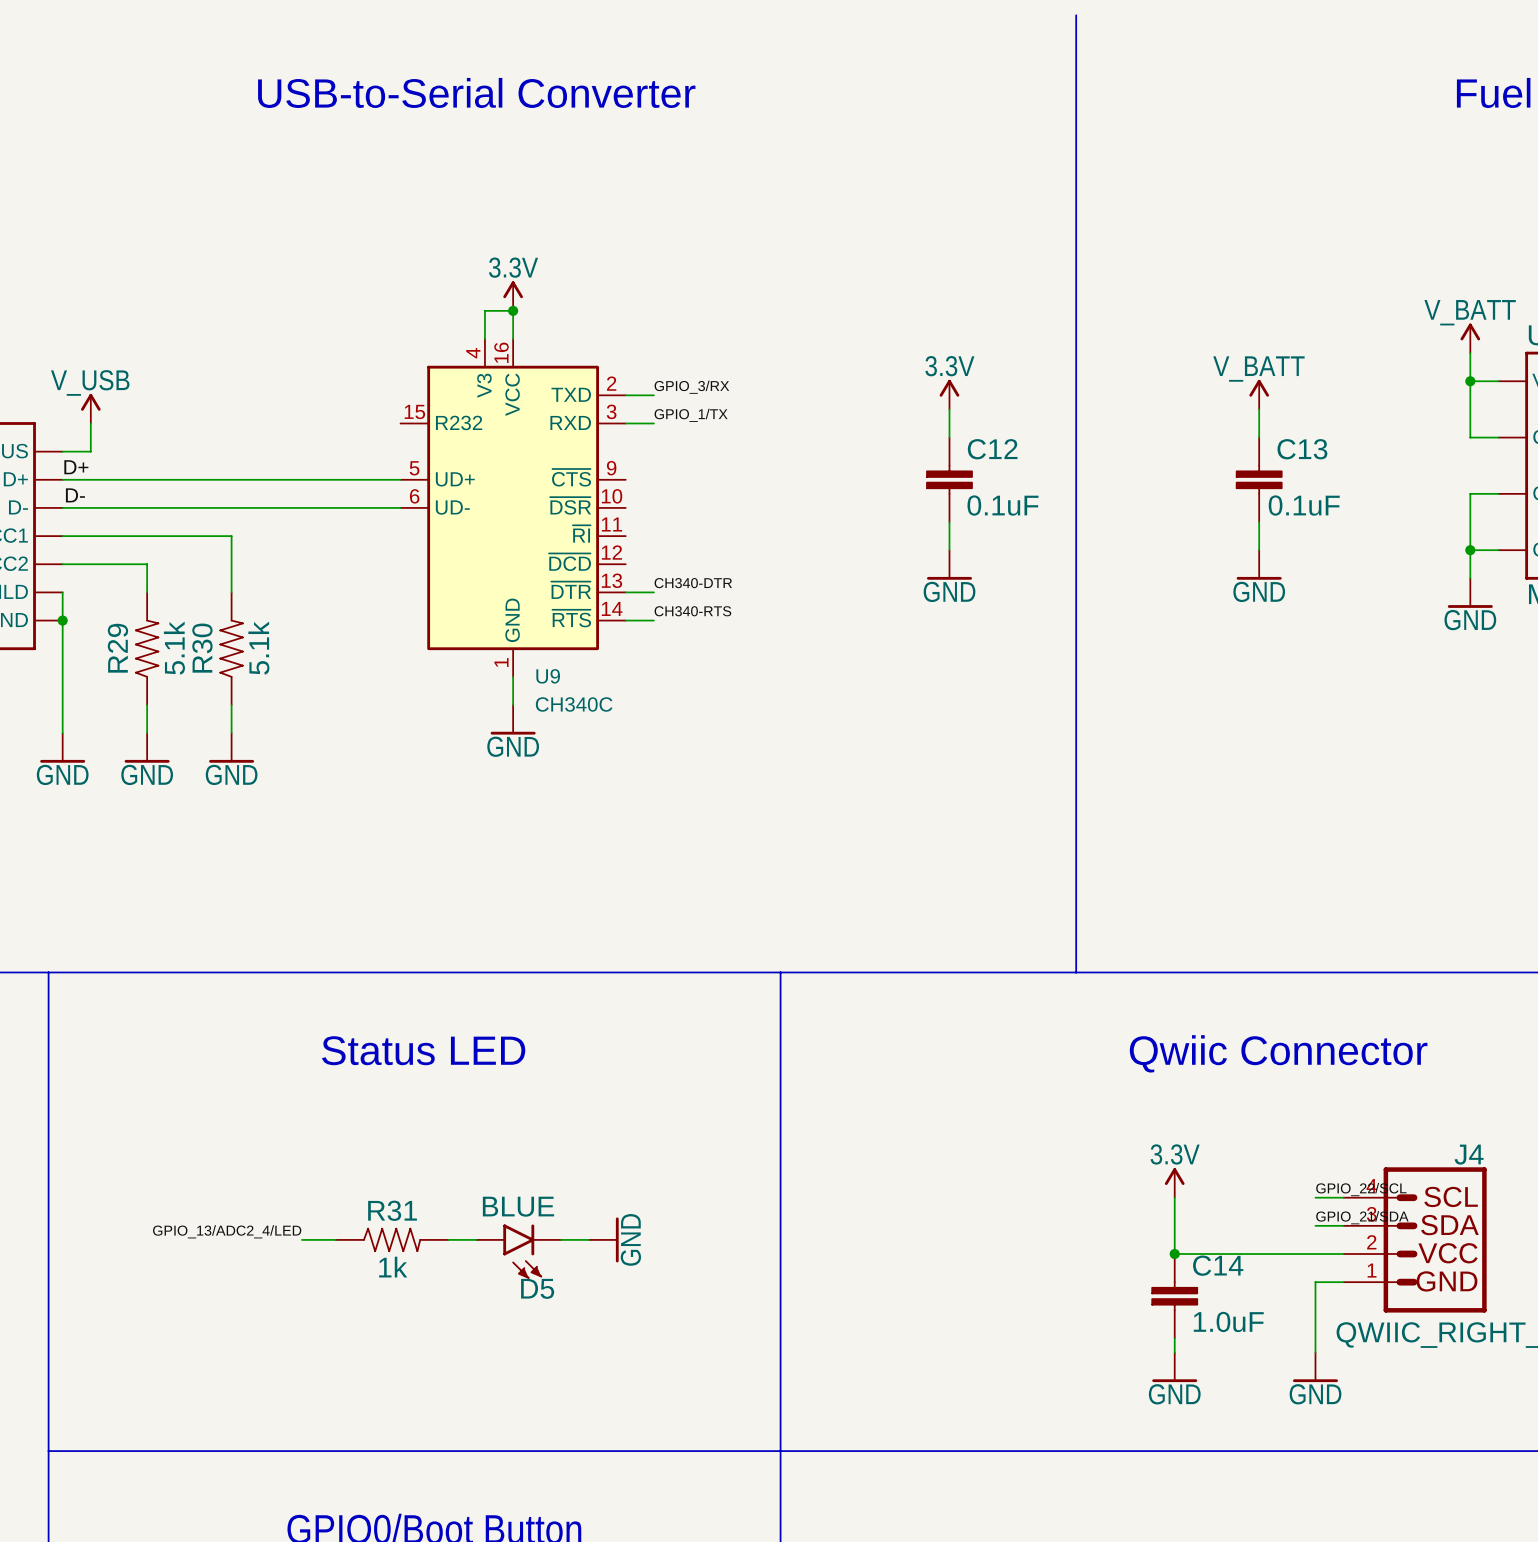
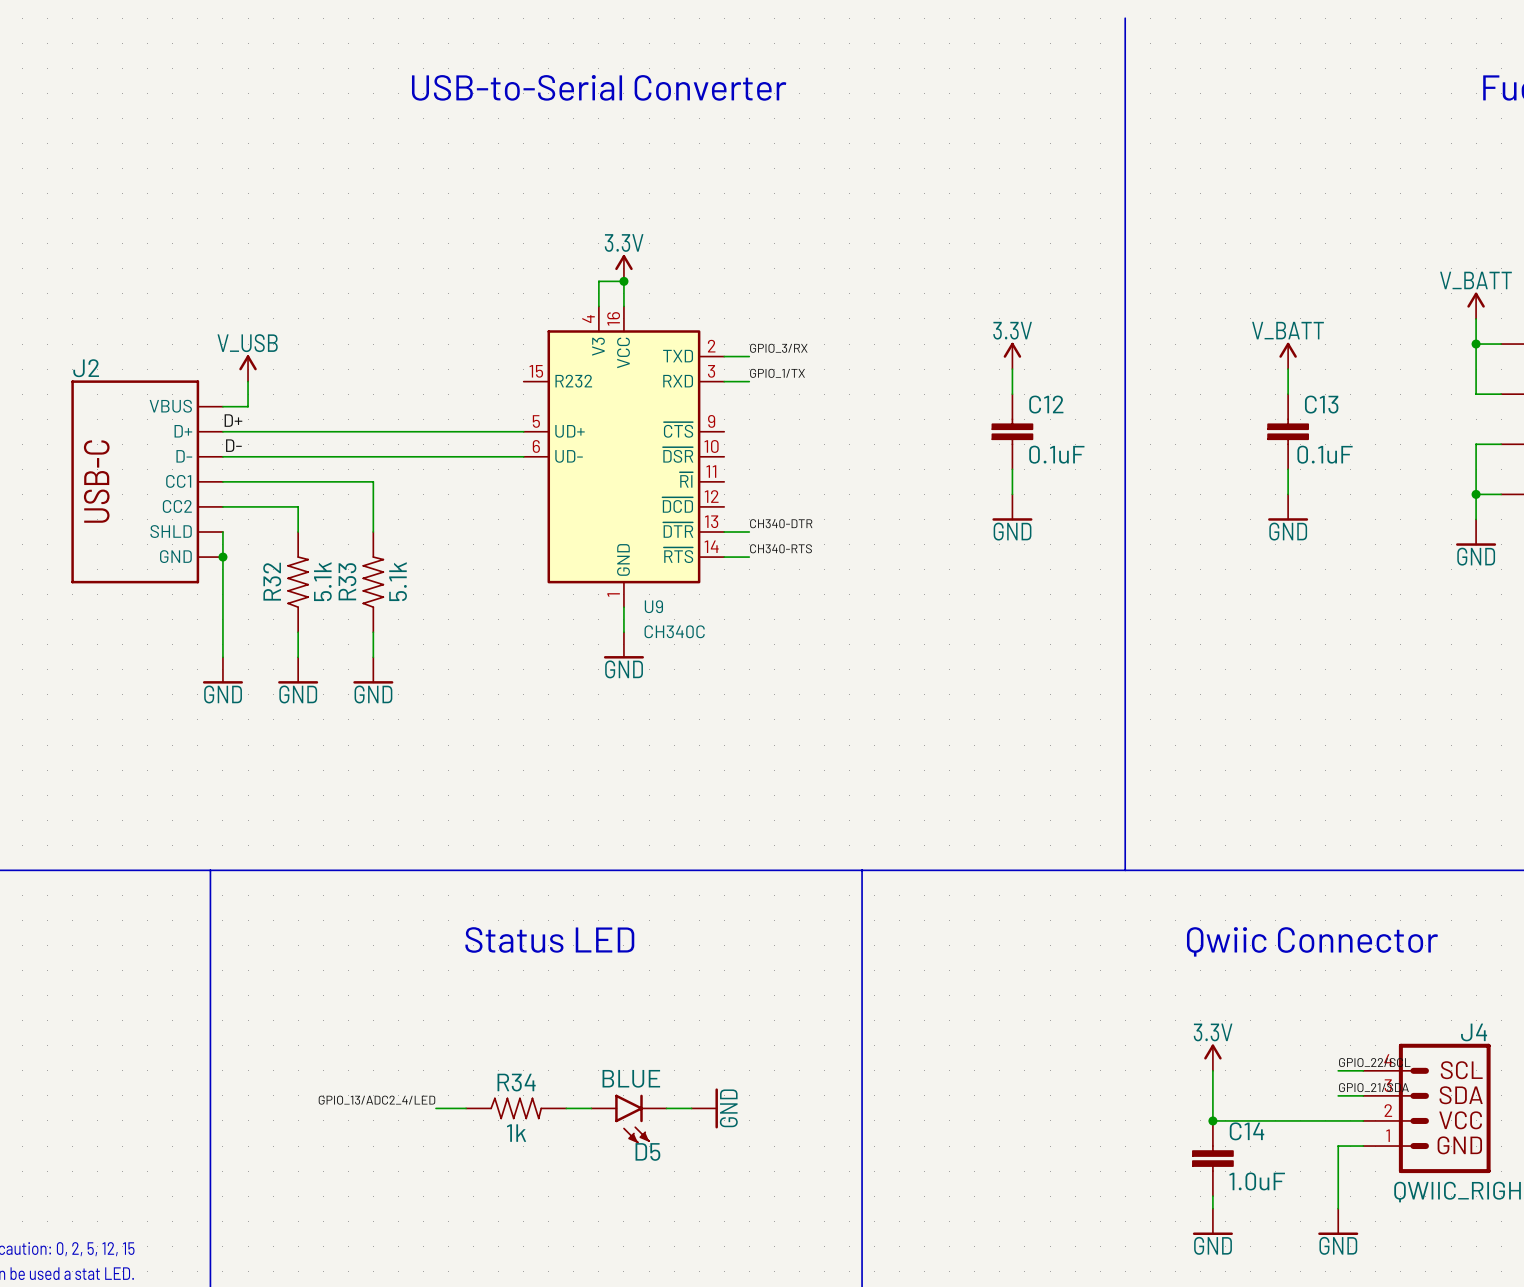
R29 name: R29 (117, 648) -> R32 (272, 581)
R30 name: R30 (202, 648) -> R33 (347, 581)
R31 name: R31 (392, 1210) -> R34 (516, 1082)

